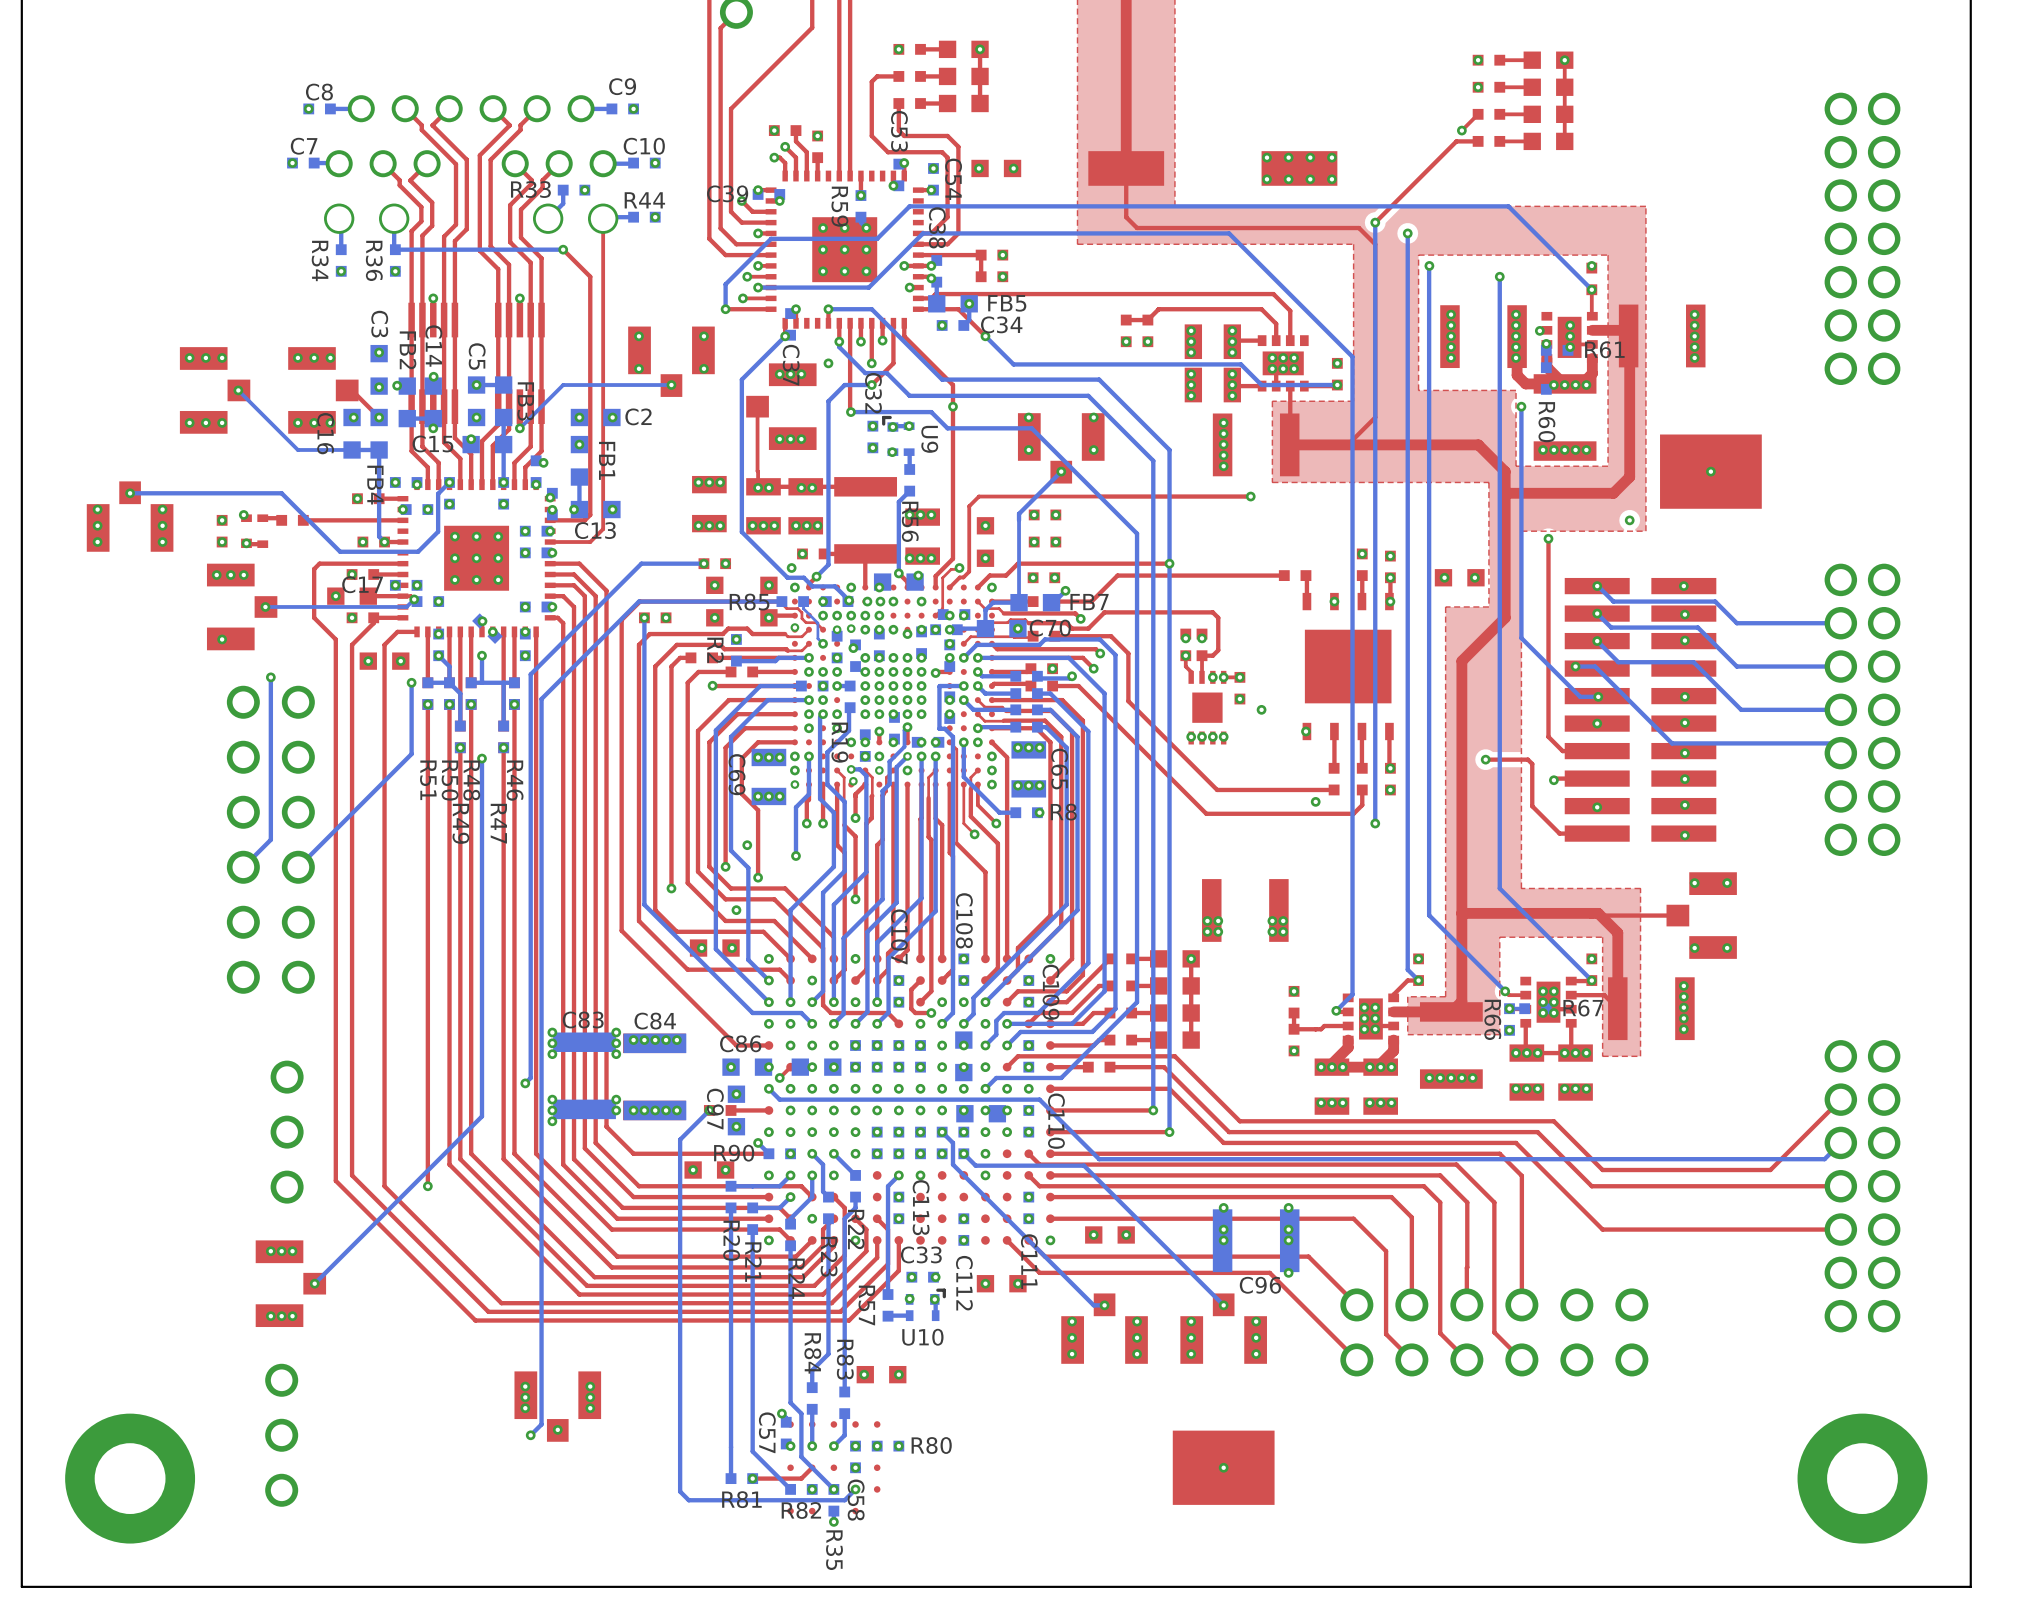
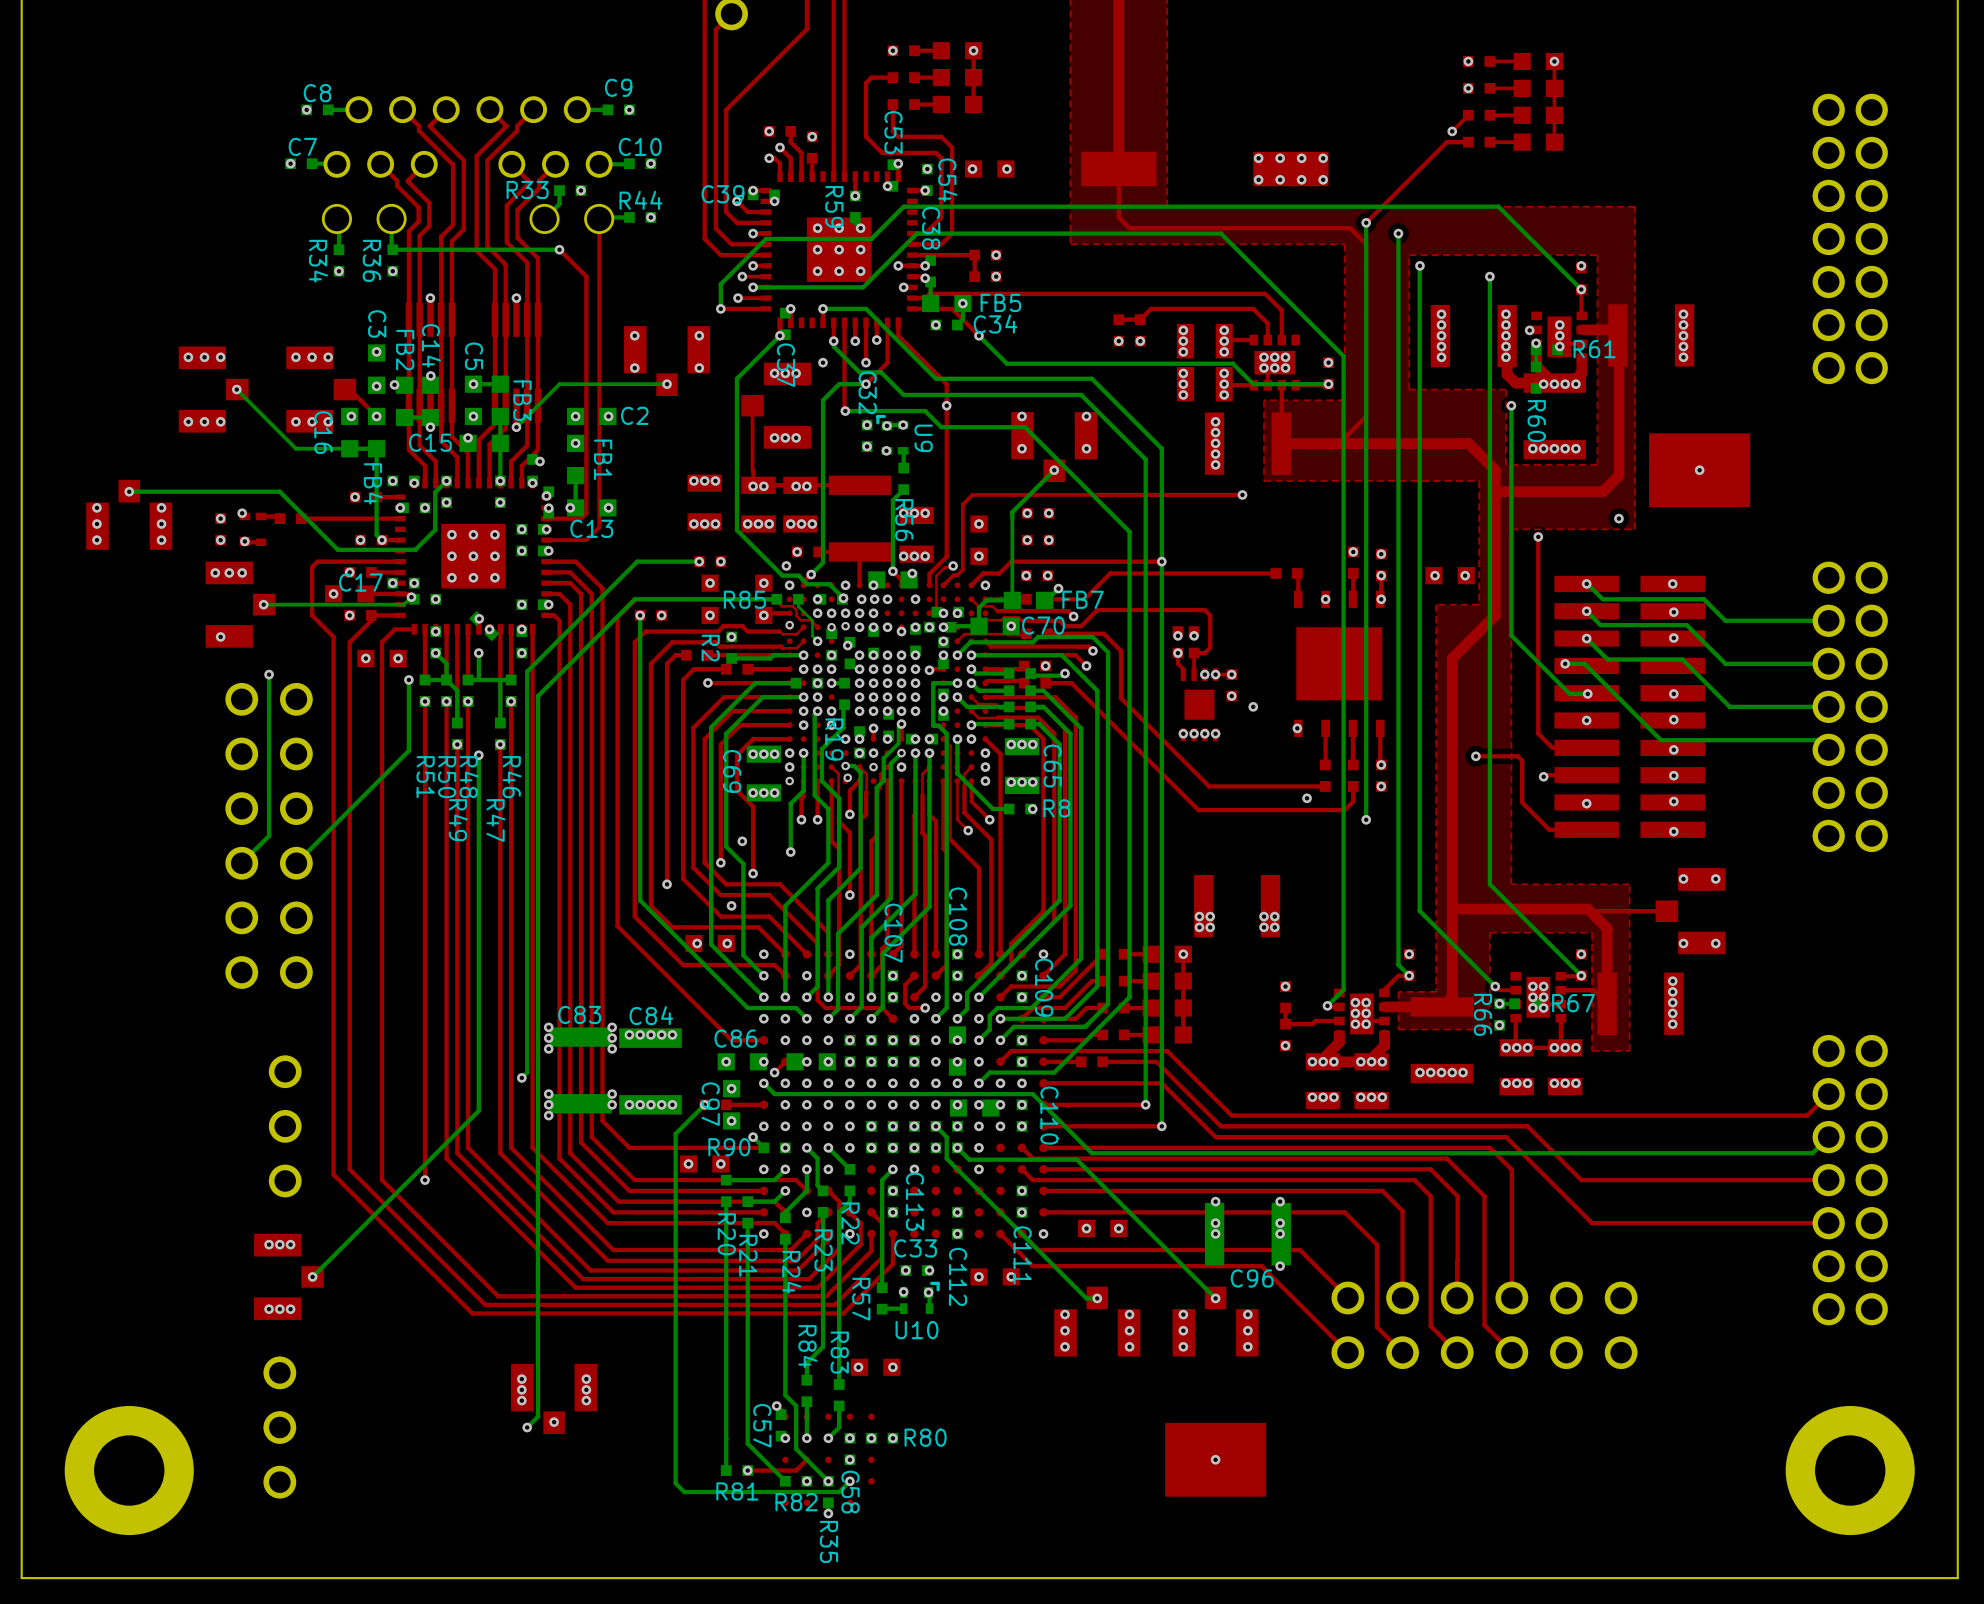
top track: (1819, 1121) (1770, 1170) (1602, 1170) (1553, 1121) -> (1807, 1115) (1543, 1115)

